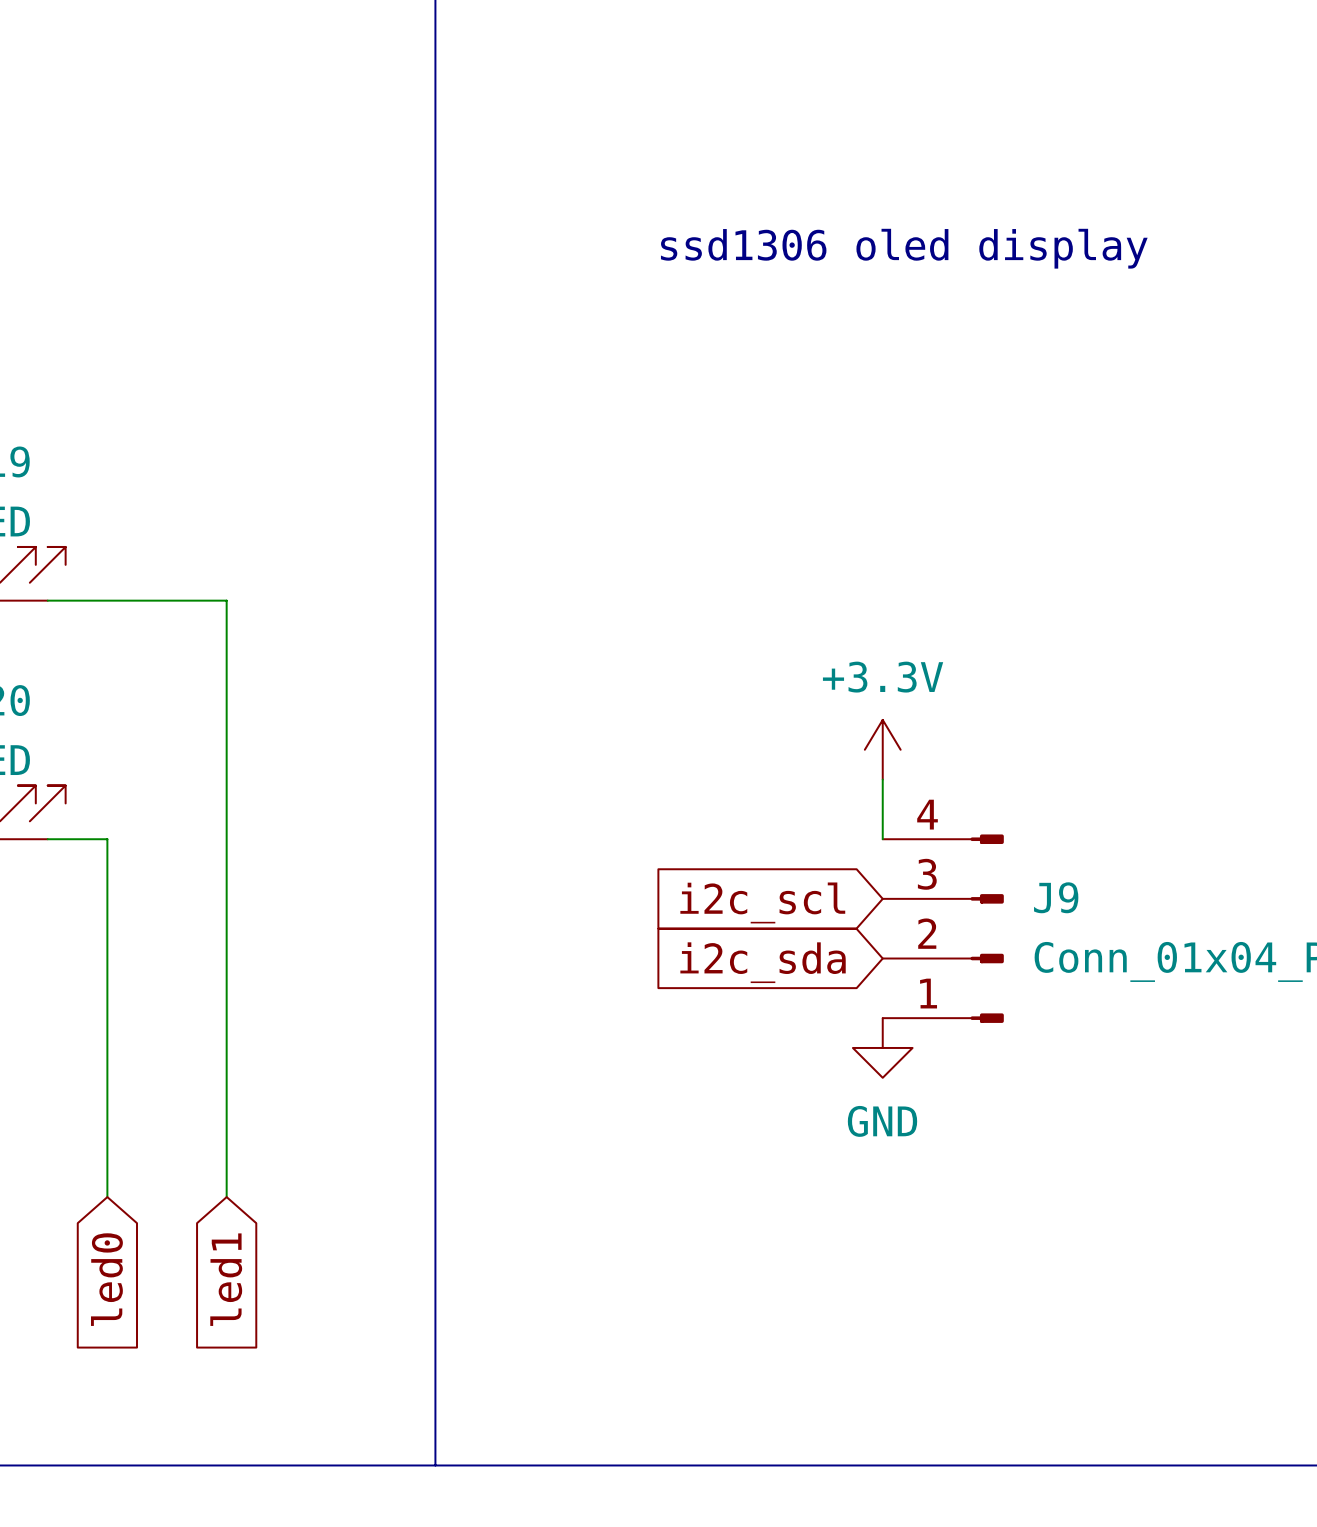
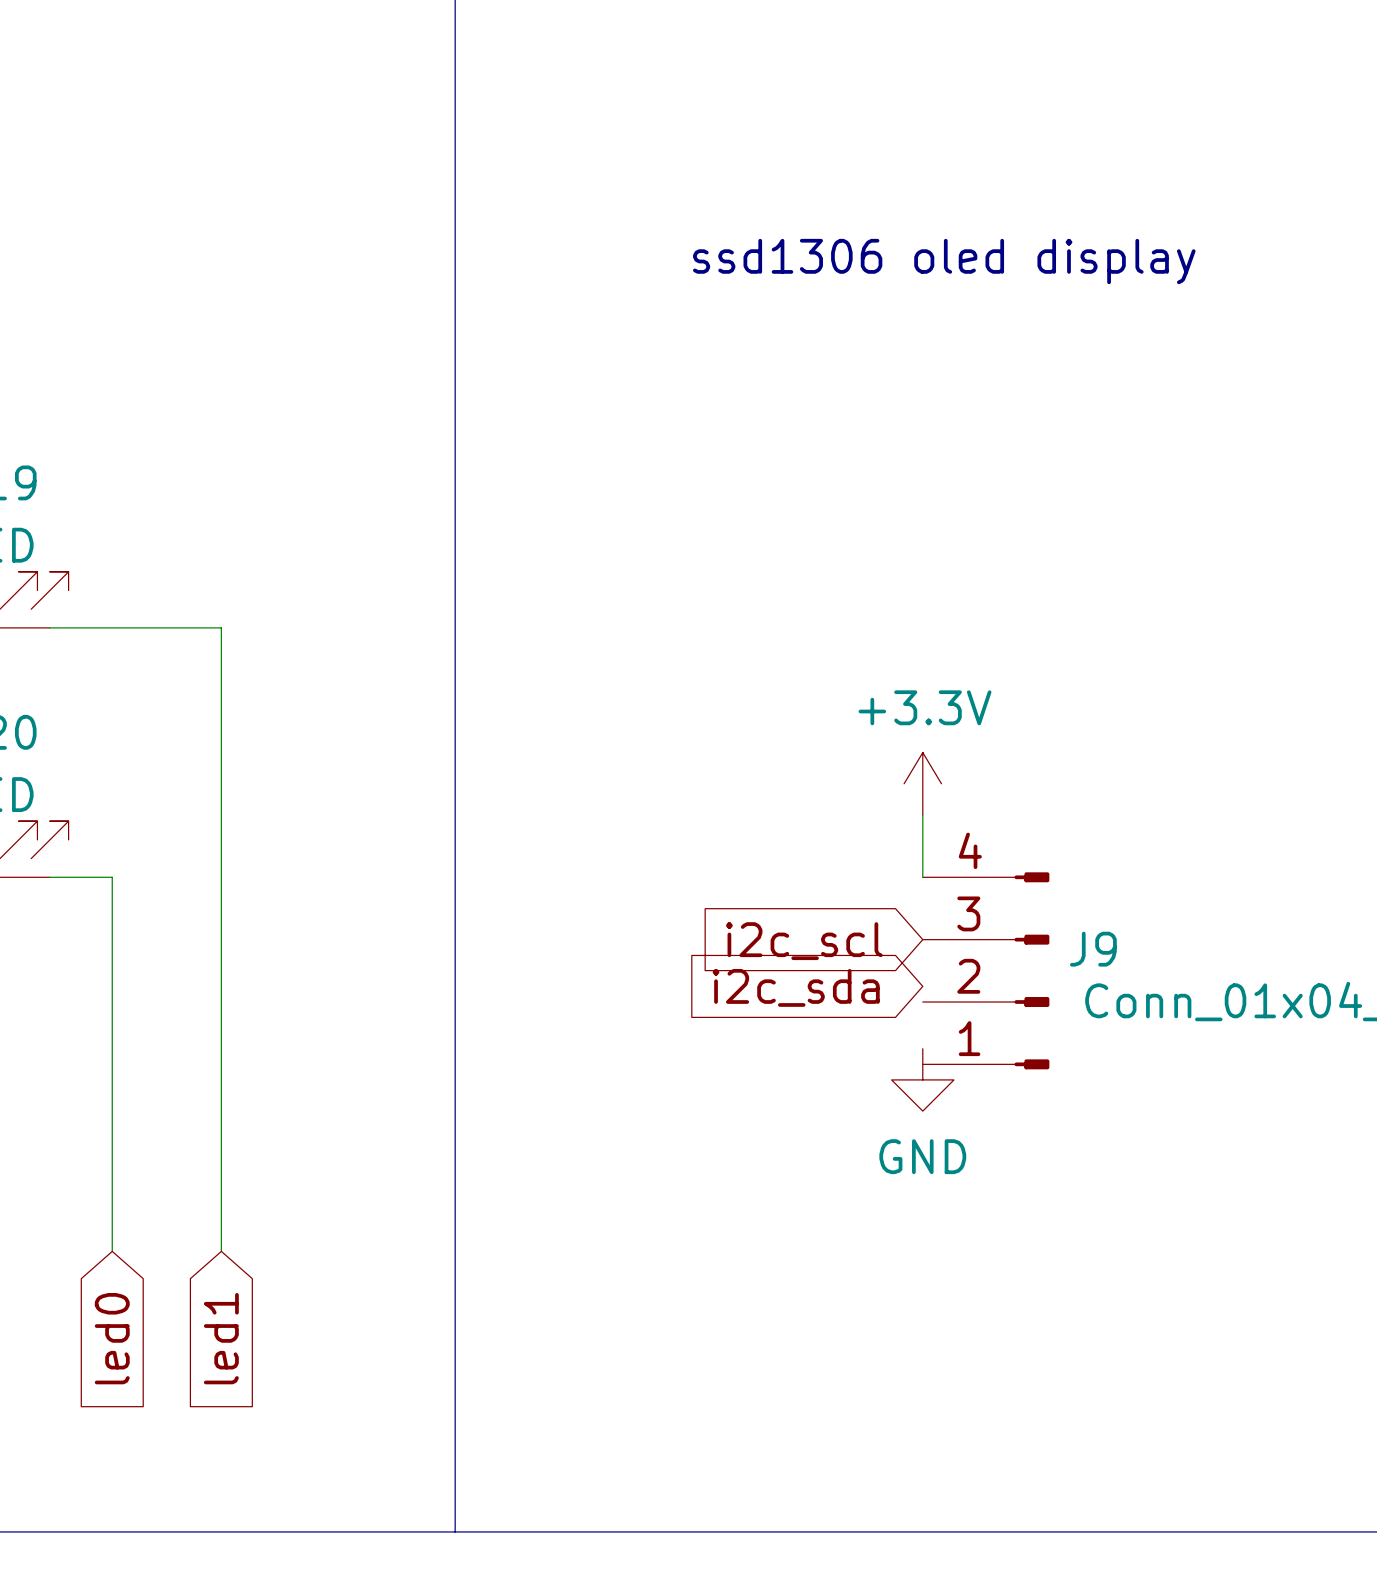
wire: (211, 600) (226, 600) (226, 1197) -> (221, 627) (221, 1251)
J9 name position: J9 (1056, 897) -> J9 (1093, 949)
global label position: i2c_sda (763, 962) -> i2c_sda (796, 987)
power symbol position: GND (882, 1047) -> GND (922, 1079)
global label position: led1 (226, 1279) -> led1 (221, 1338)

